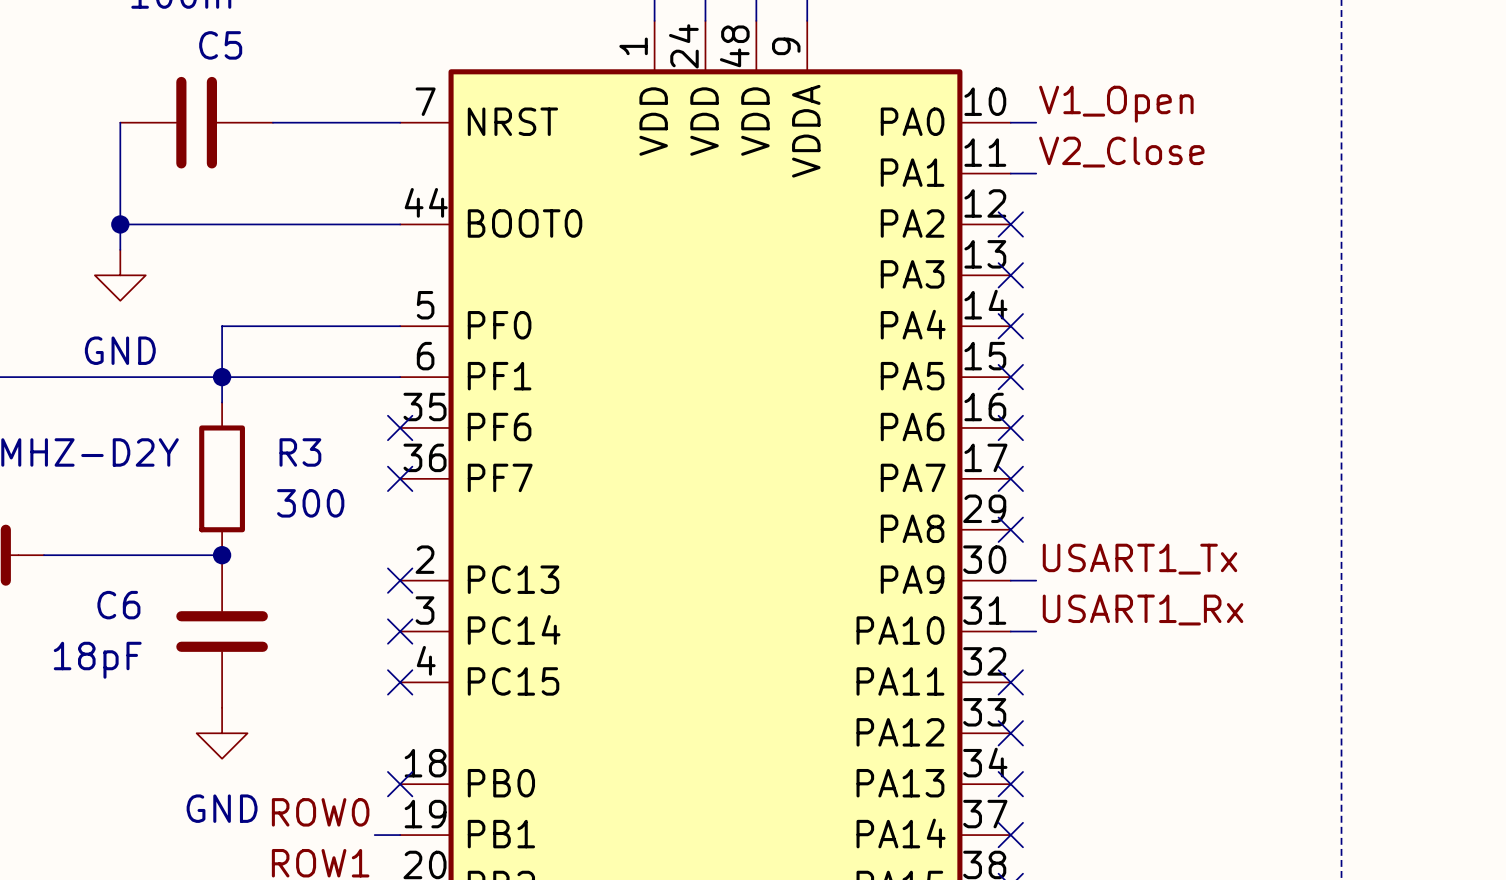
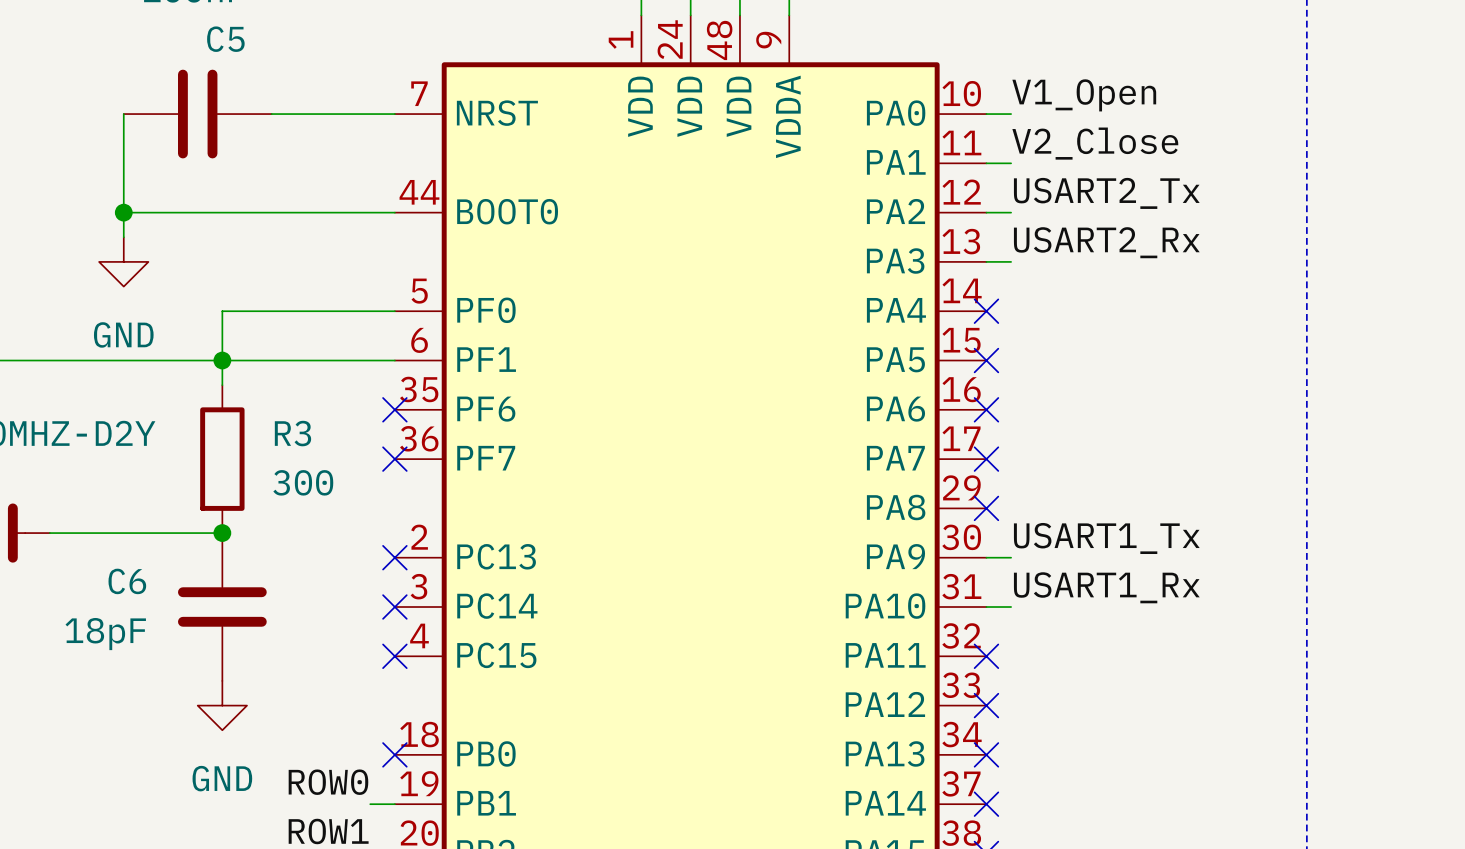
label: none -> USART2_Tx (1106, 193)
wire: none -> (986, 212) (1011, 212)
no-connect mark: (1010, 224) -> none
label: none -> USART2_Rx (1106, 242)
wire: none -> (986, 261) (1011, 261)
no-connect mark: (1010, 275) -> none

